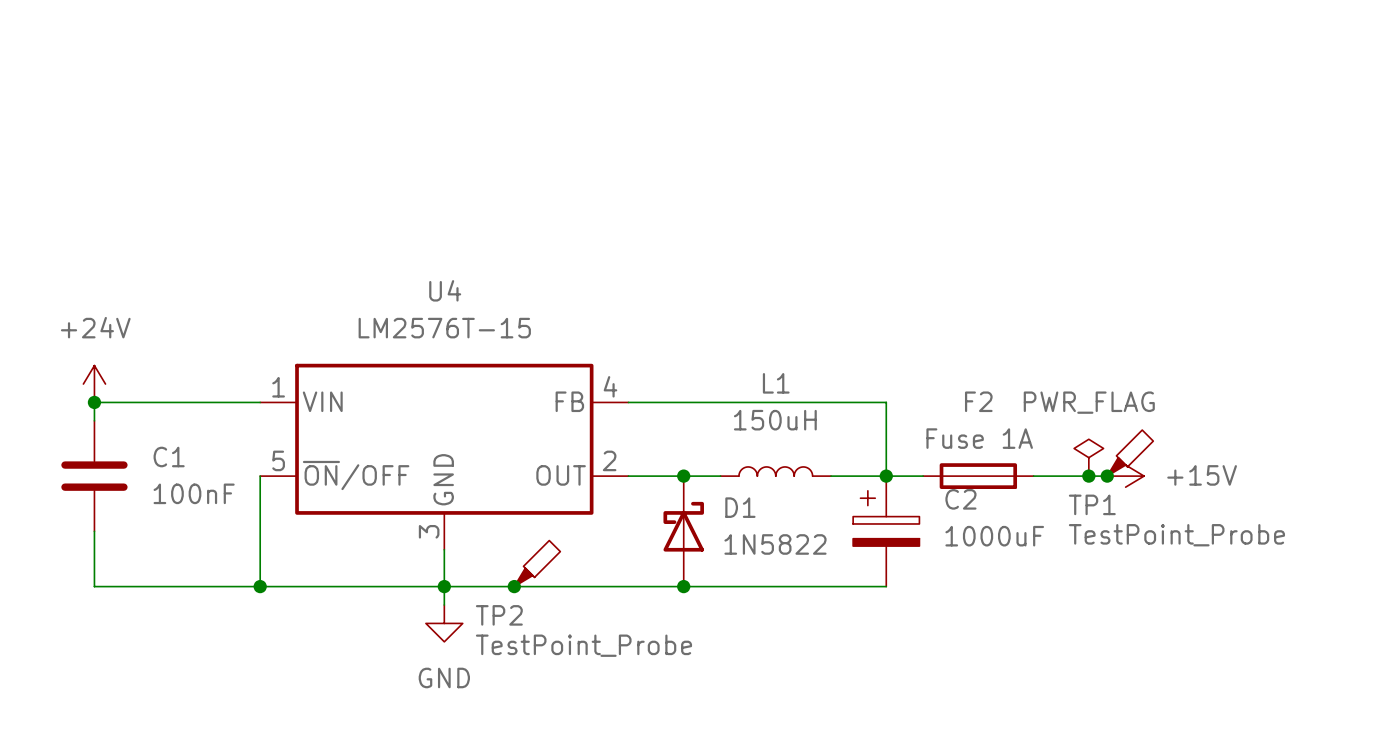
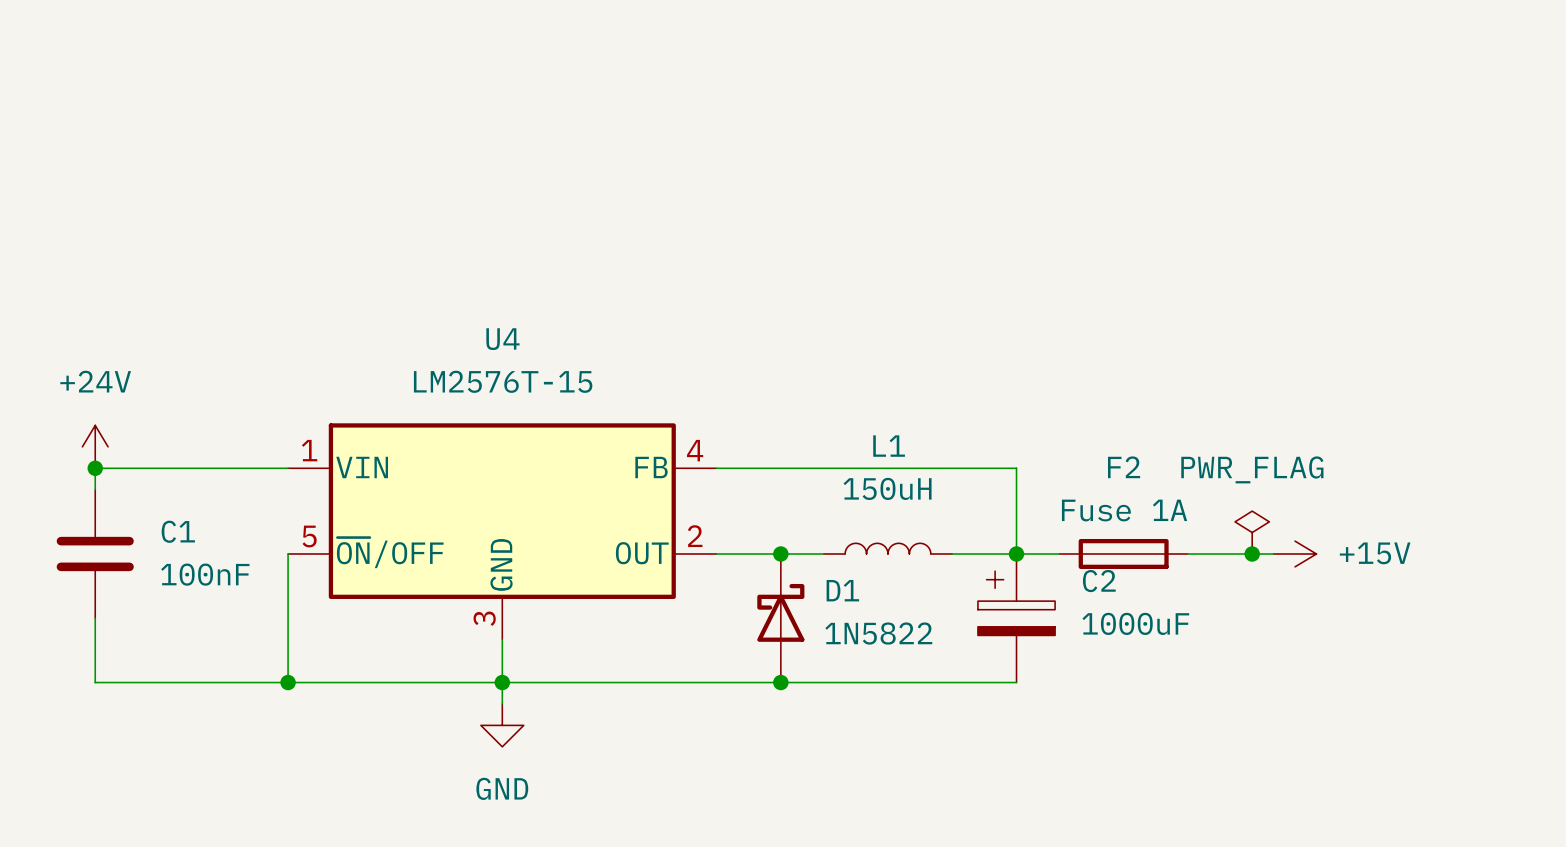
TP1: TestPoint_Probe (1130, 453) -> none
junction: (1107, 476) -> none
TP2: TestPoint_Probe (537, 563) -> none
junction: (514, 586) -> none

